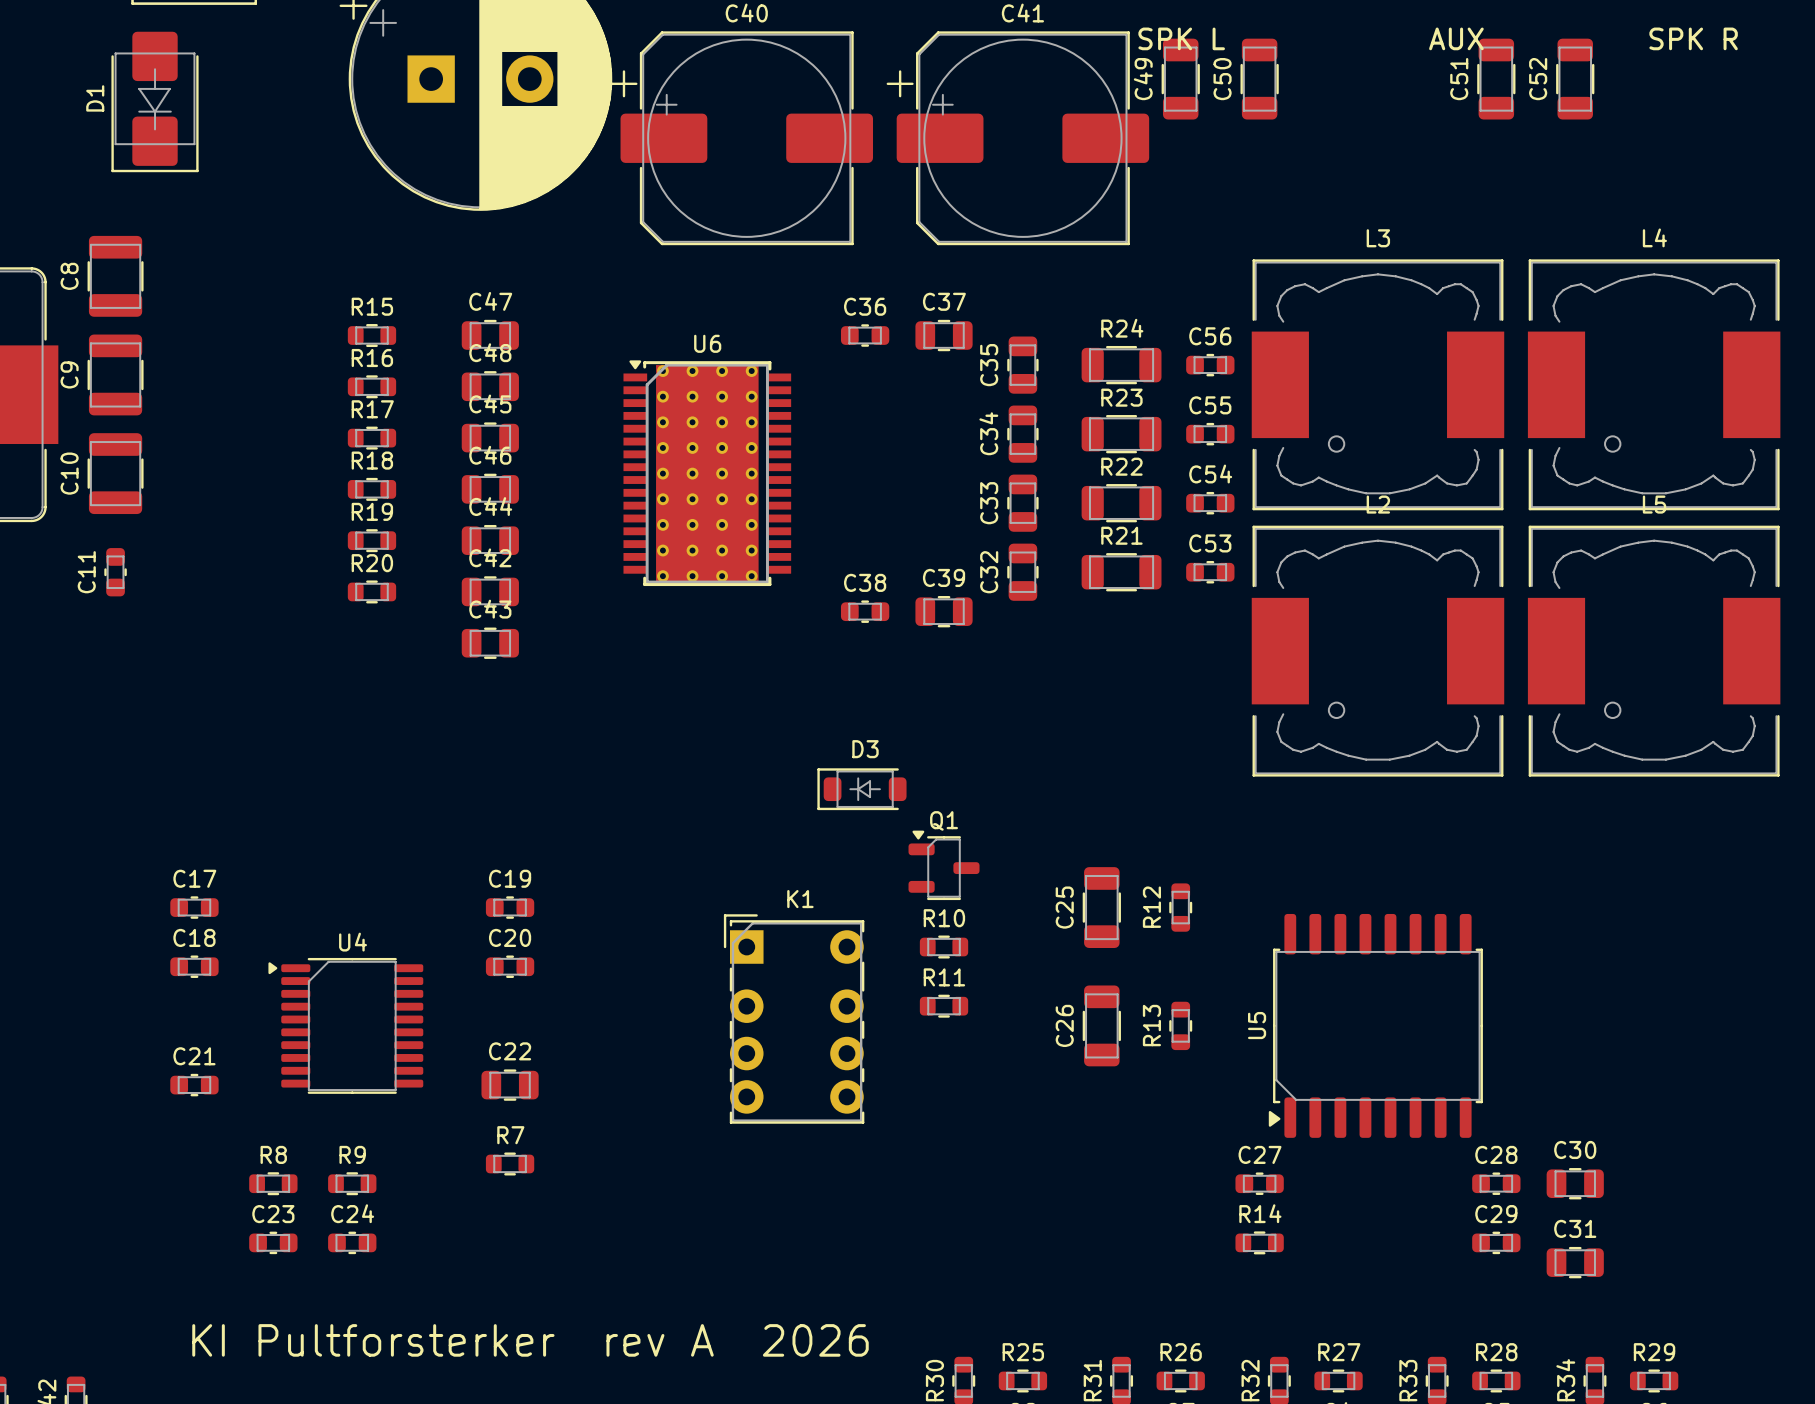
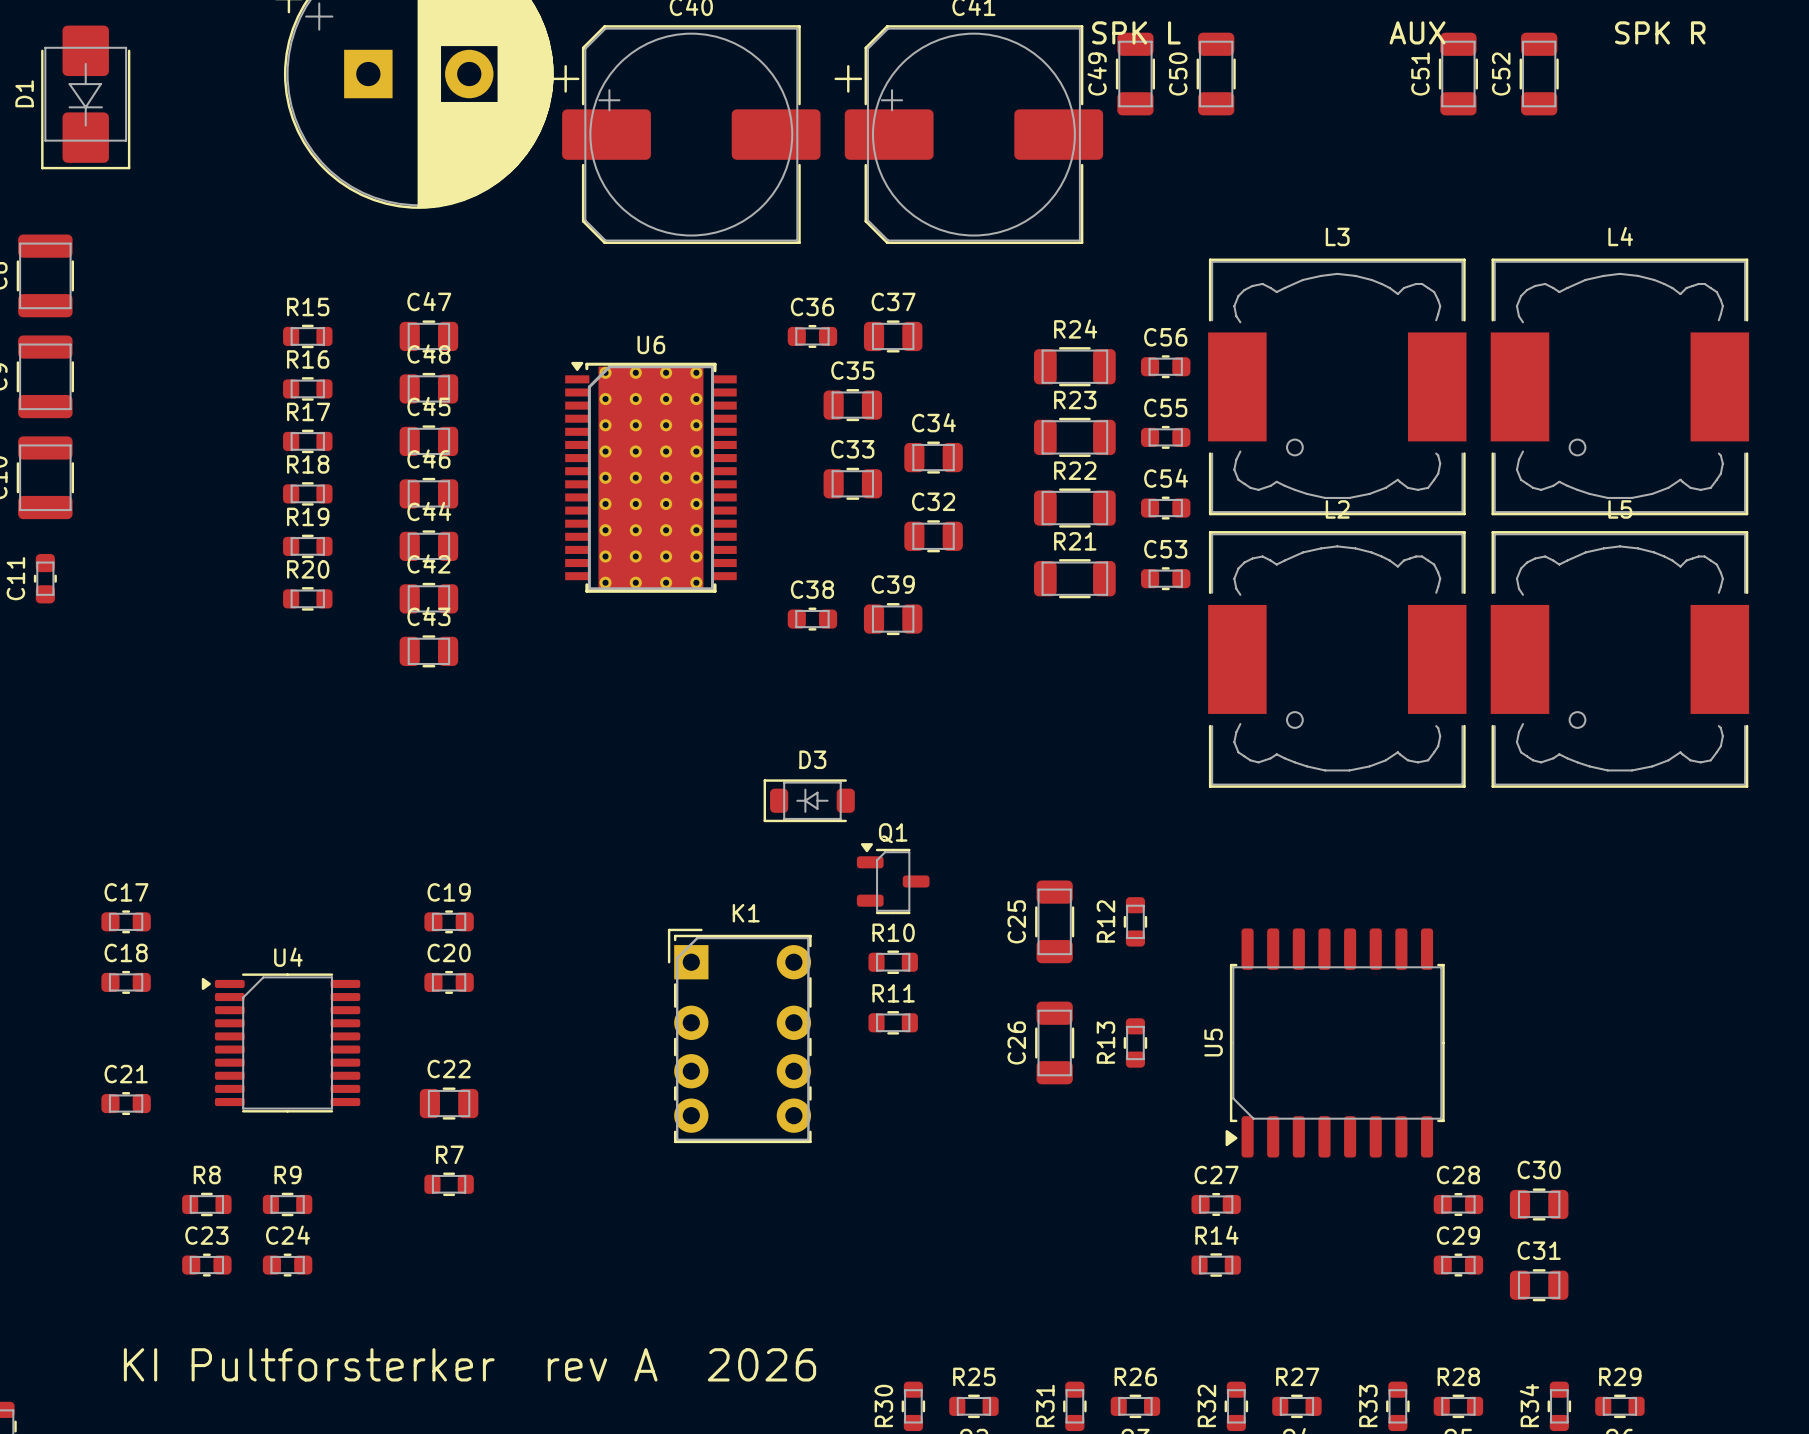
C35 rotation: 0° (1022, 365) -> 90° clockwise (852, 405)
C35 position: (1022, 365) -> (852, 405)
C34 rotation: 0° (1022, 434) -> 90° clockwise (933, 457)
C34 position: (1022, 434) -> (933, 457)
C33 rotation: 0° (1022, 503) -> 90° clockwise (852, 483)
C33 position: (1022, 503) -> (852, 483)
C32 rotation: 0° (1022, 572) -> 90° clockwise (933, 536)
C32 position: (1022, 572) -> (933, 536)

